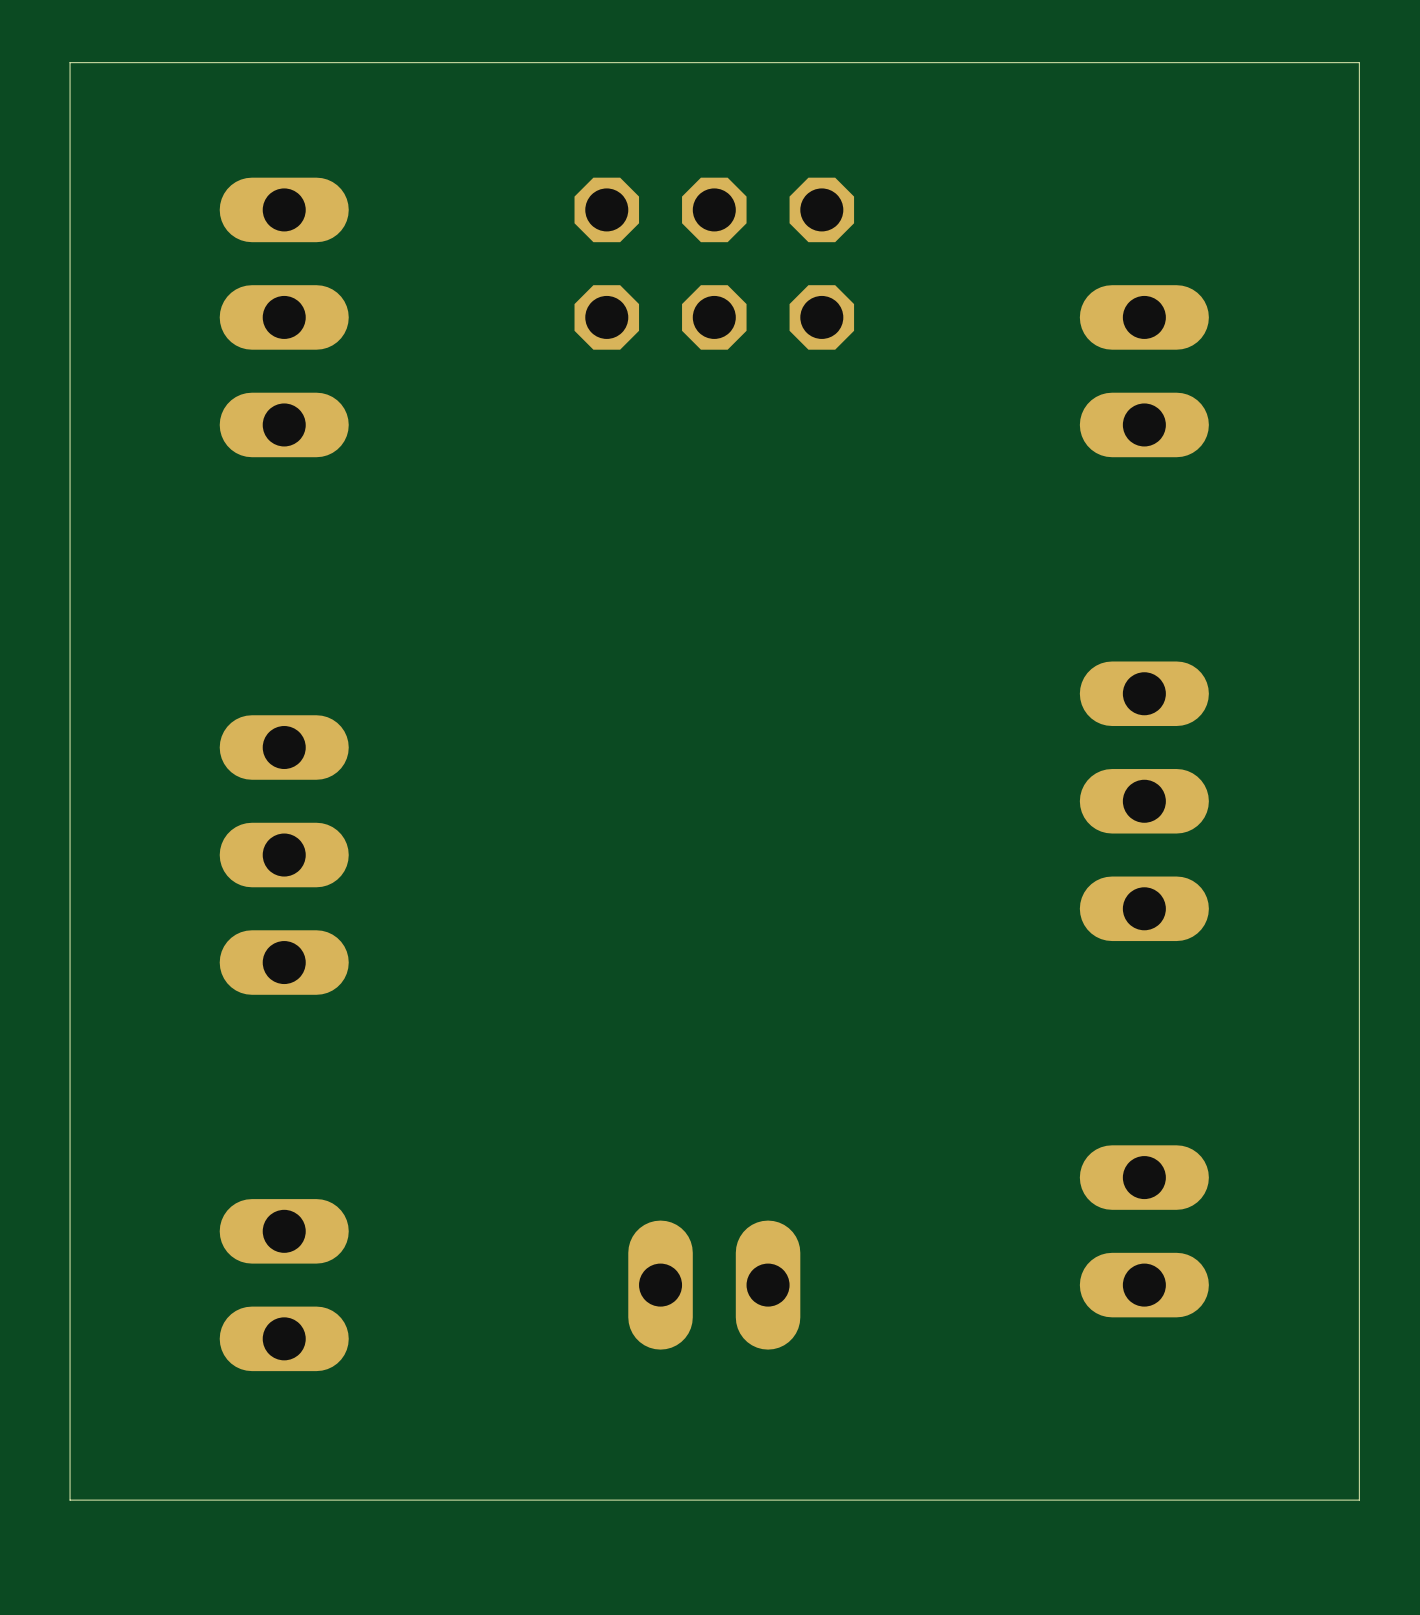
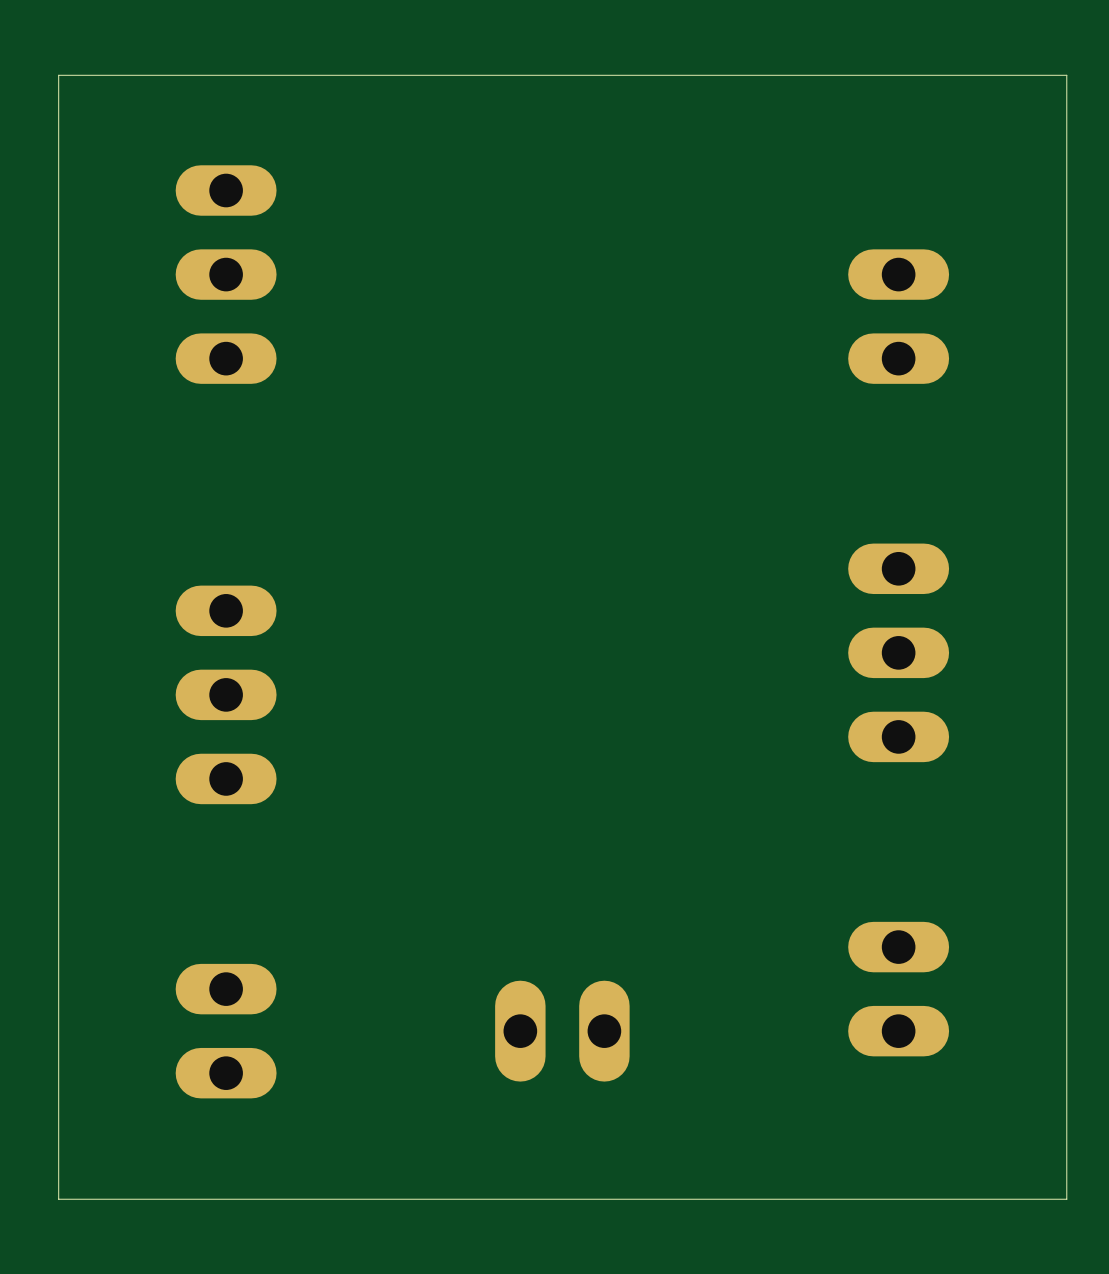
part: (714, 263) -> none

